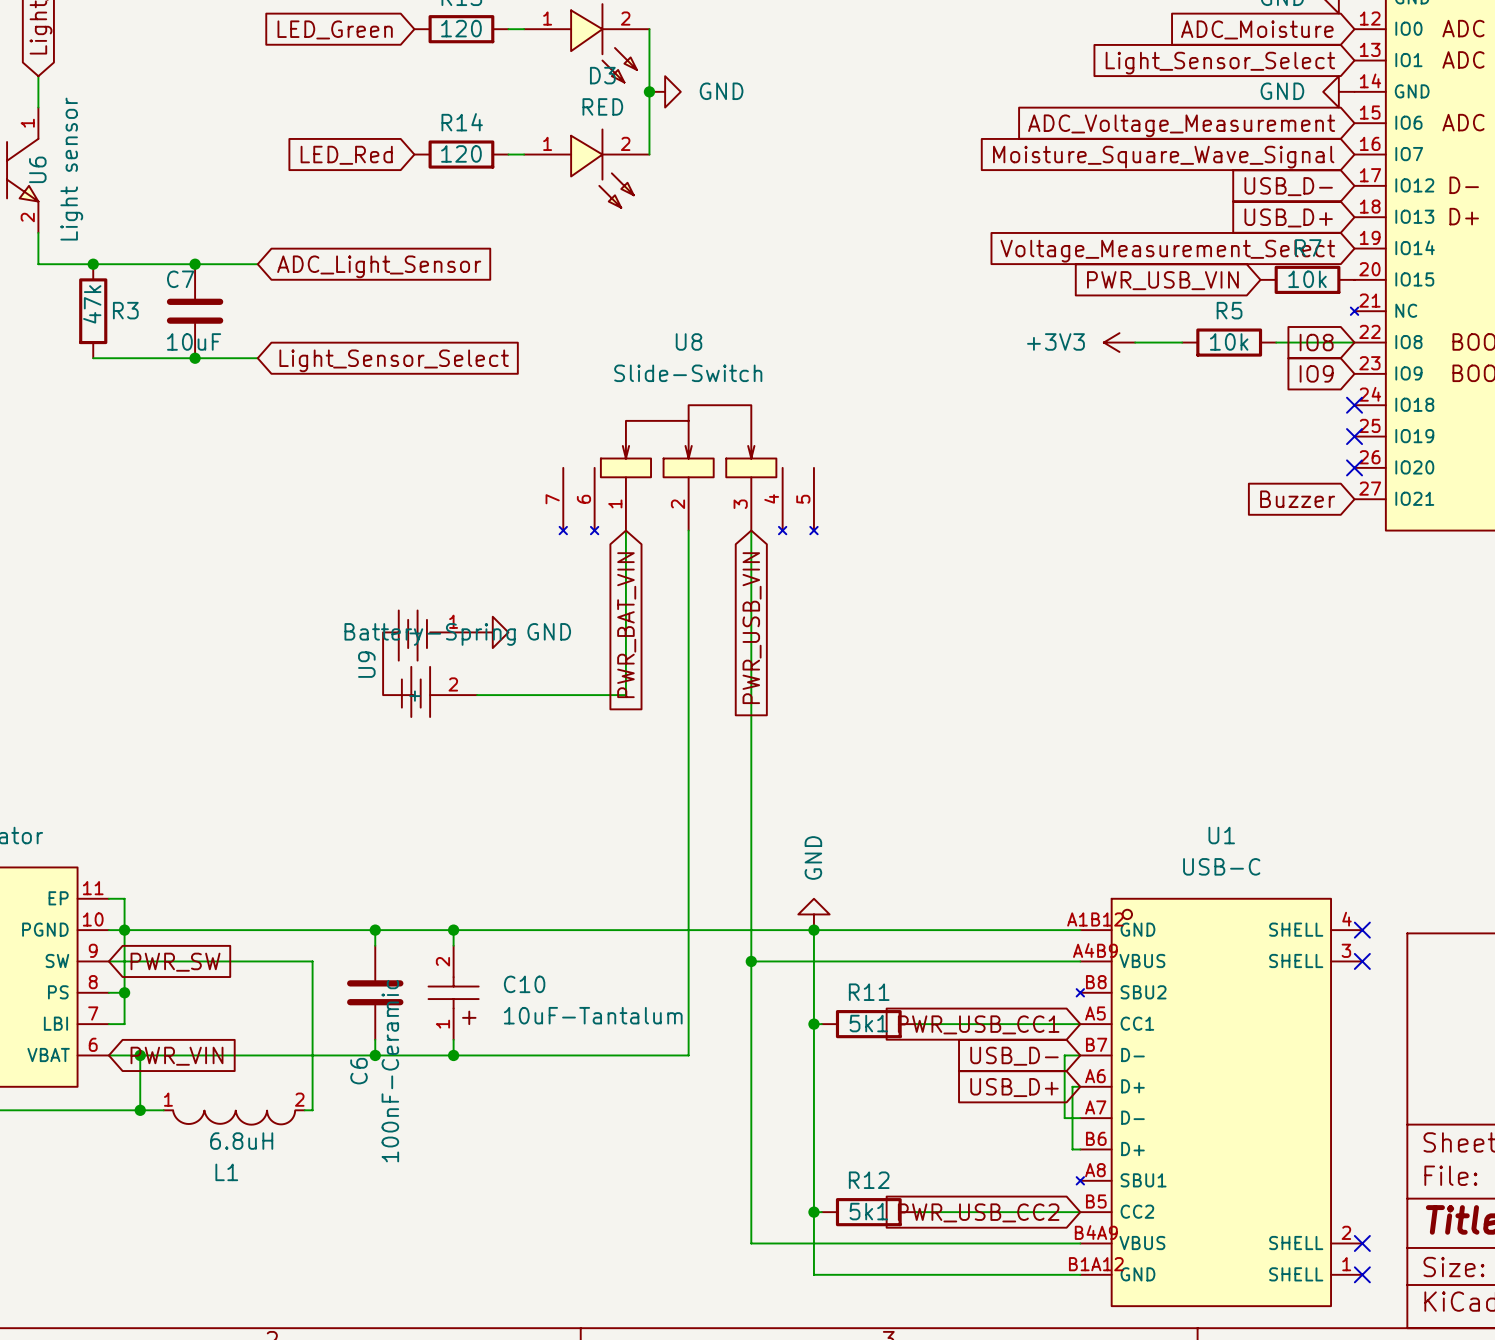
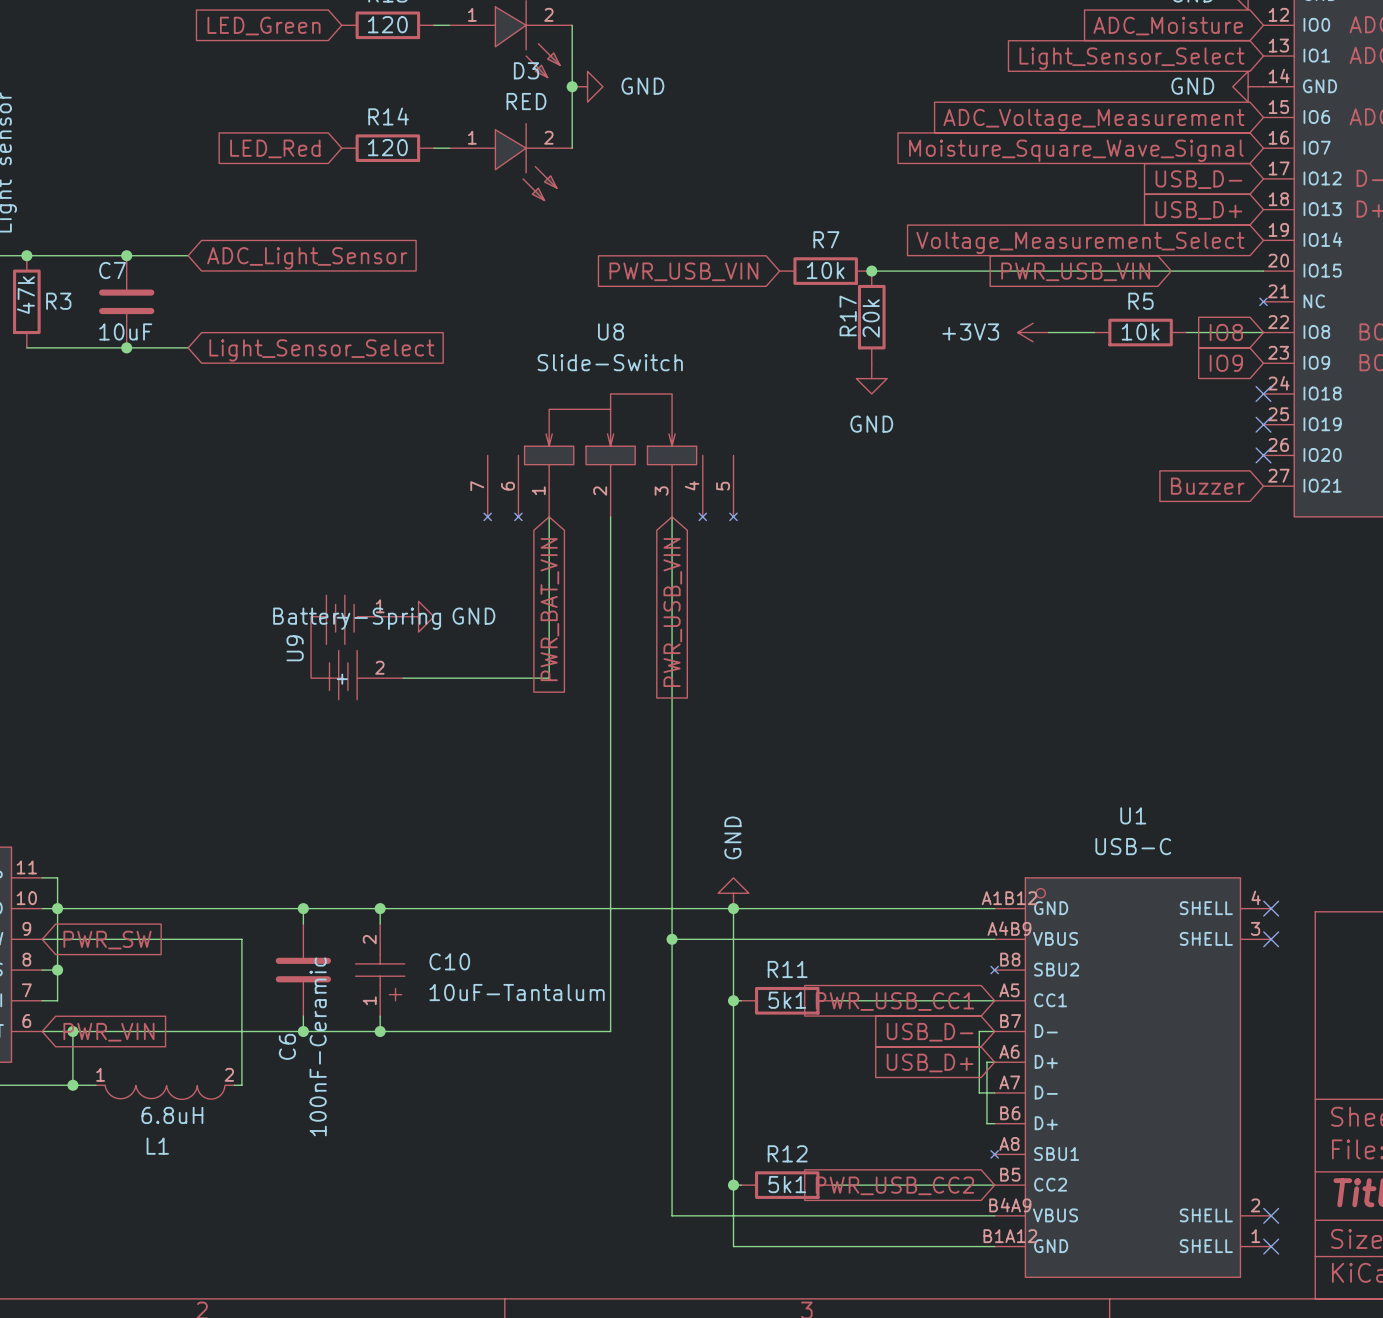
wire: none -> (871, 271) (1263, 271)
junction: none -> (871, 271)
R7 position: (1307, 279) -> (825, 271)
global label: none -> PWR_USB_VIN (683, 271)
R17: none -> 20k (871, 317)
power symbol: none -> GND (871, 378)

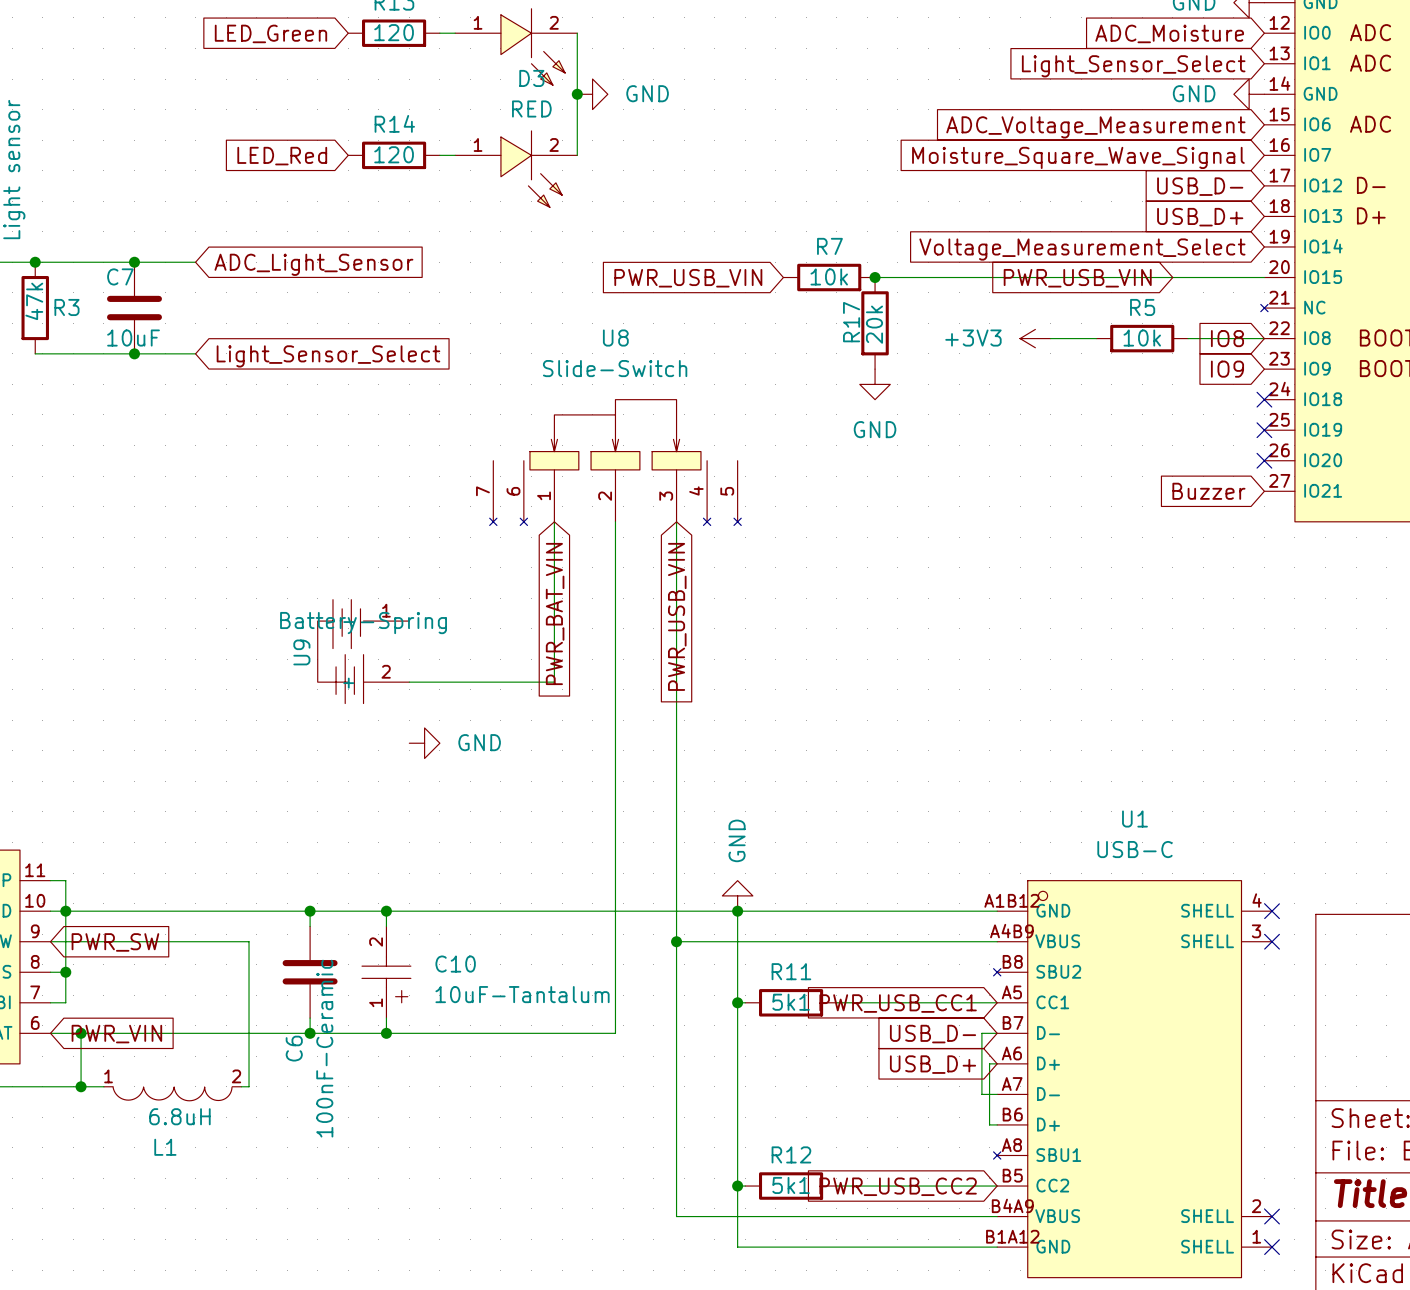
power symbol position: GND (418, 616) -> GND (424, 743)

